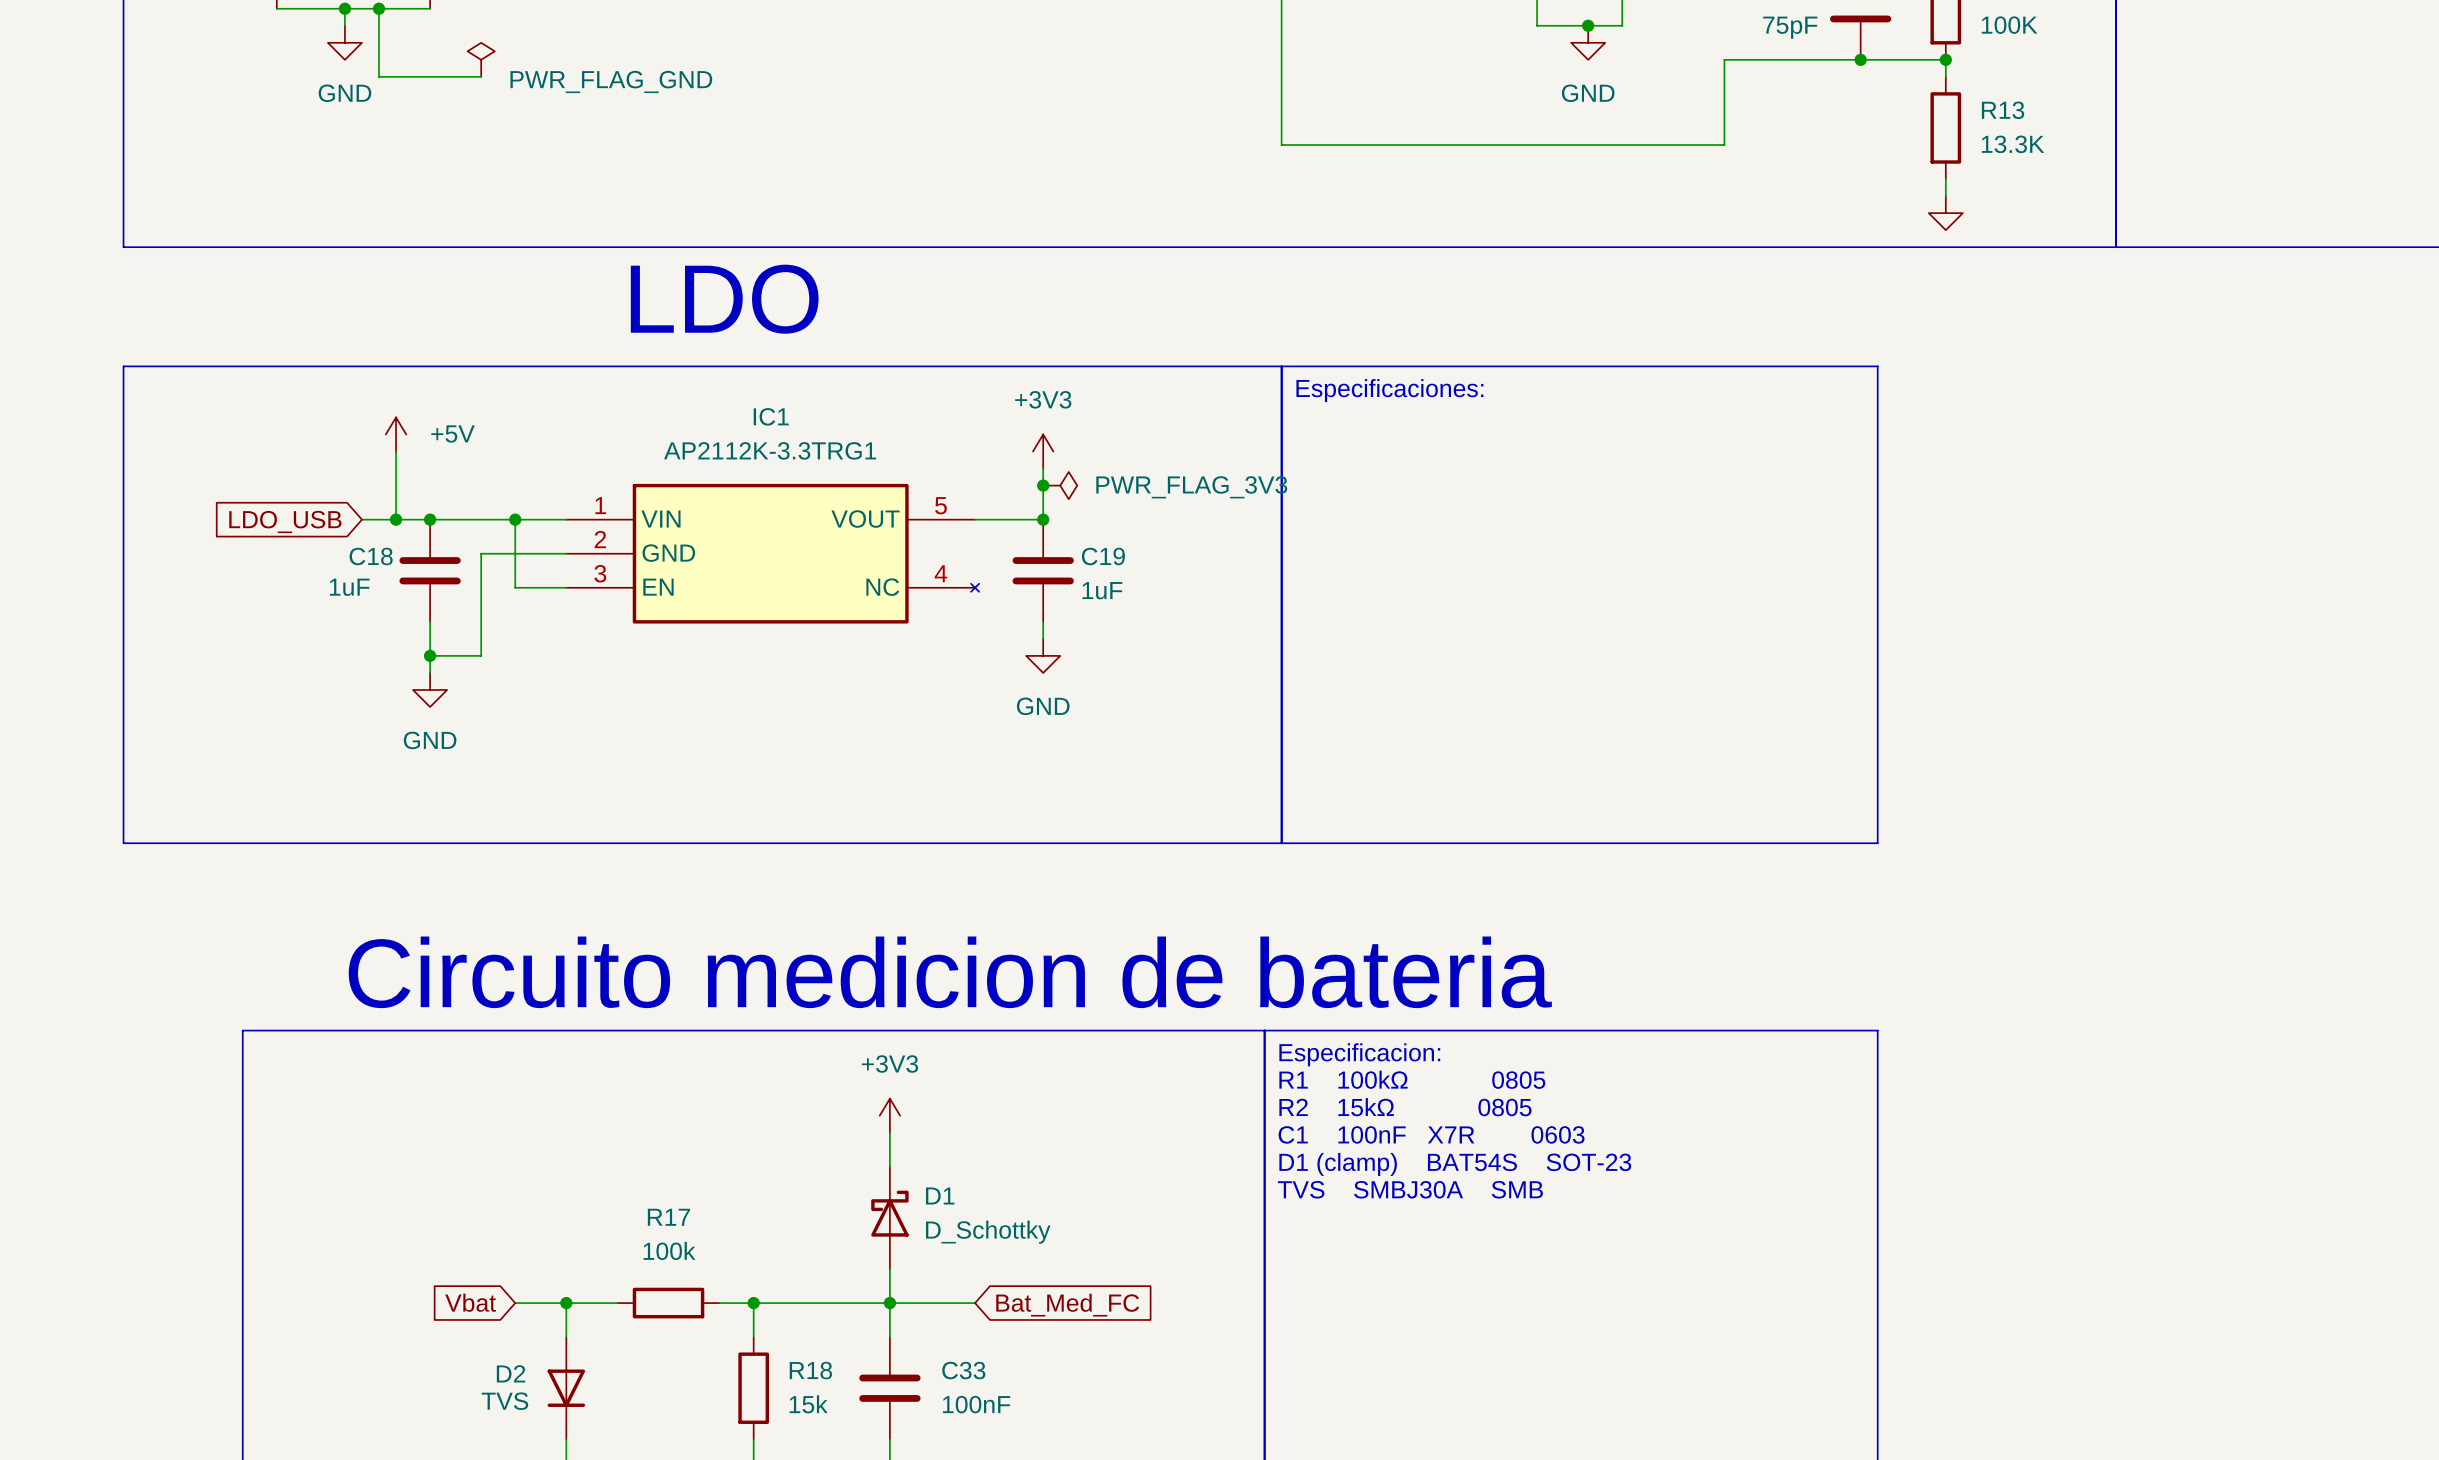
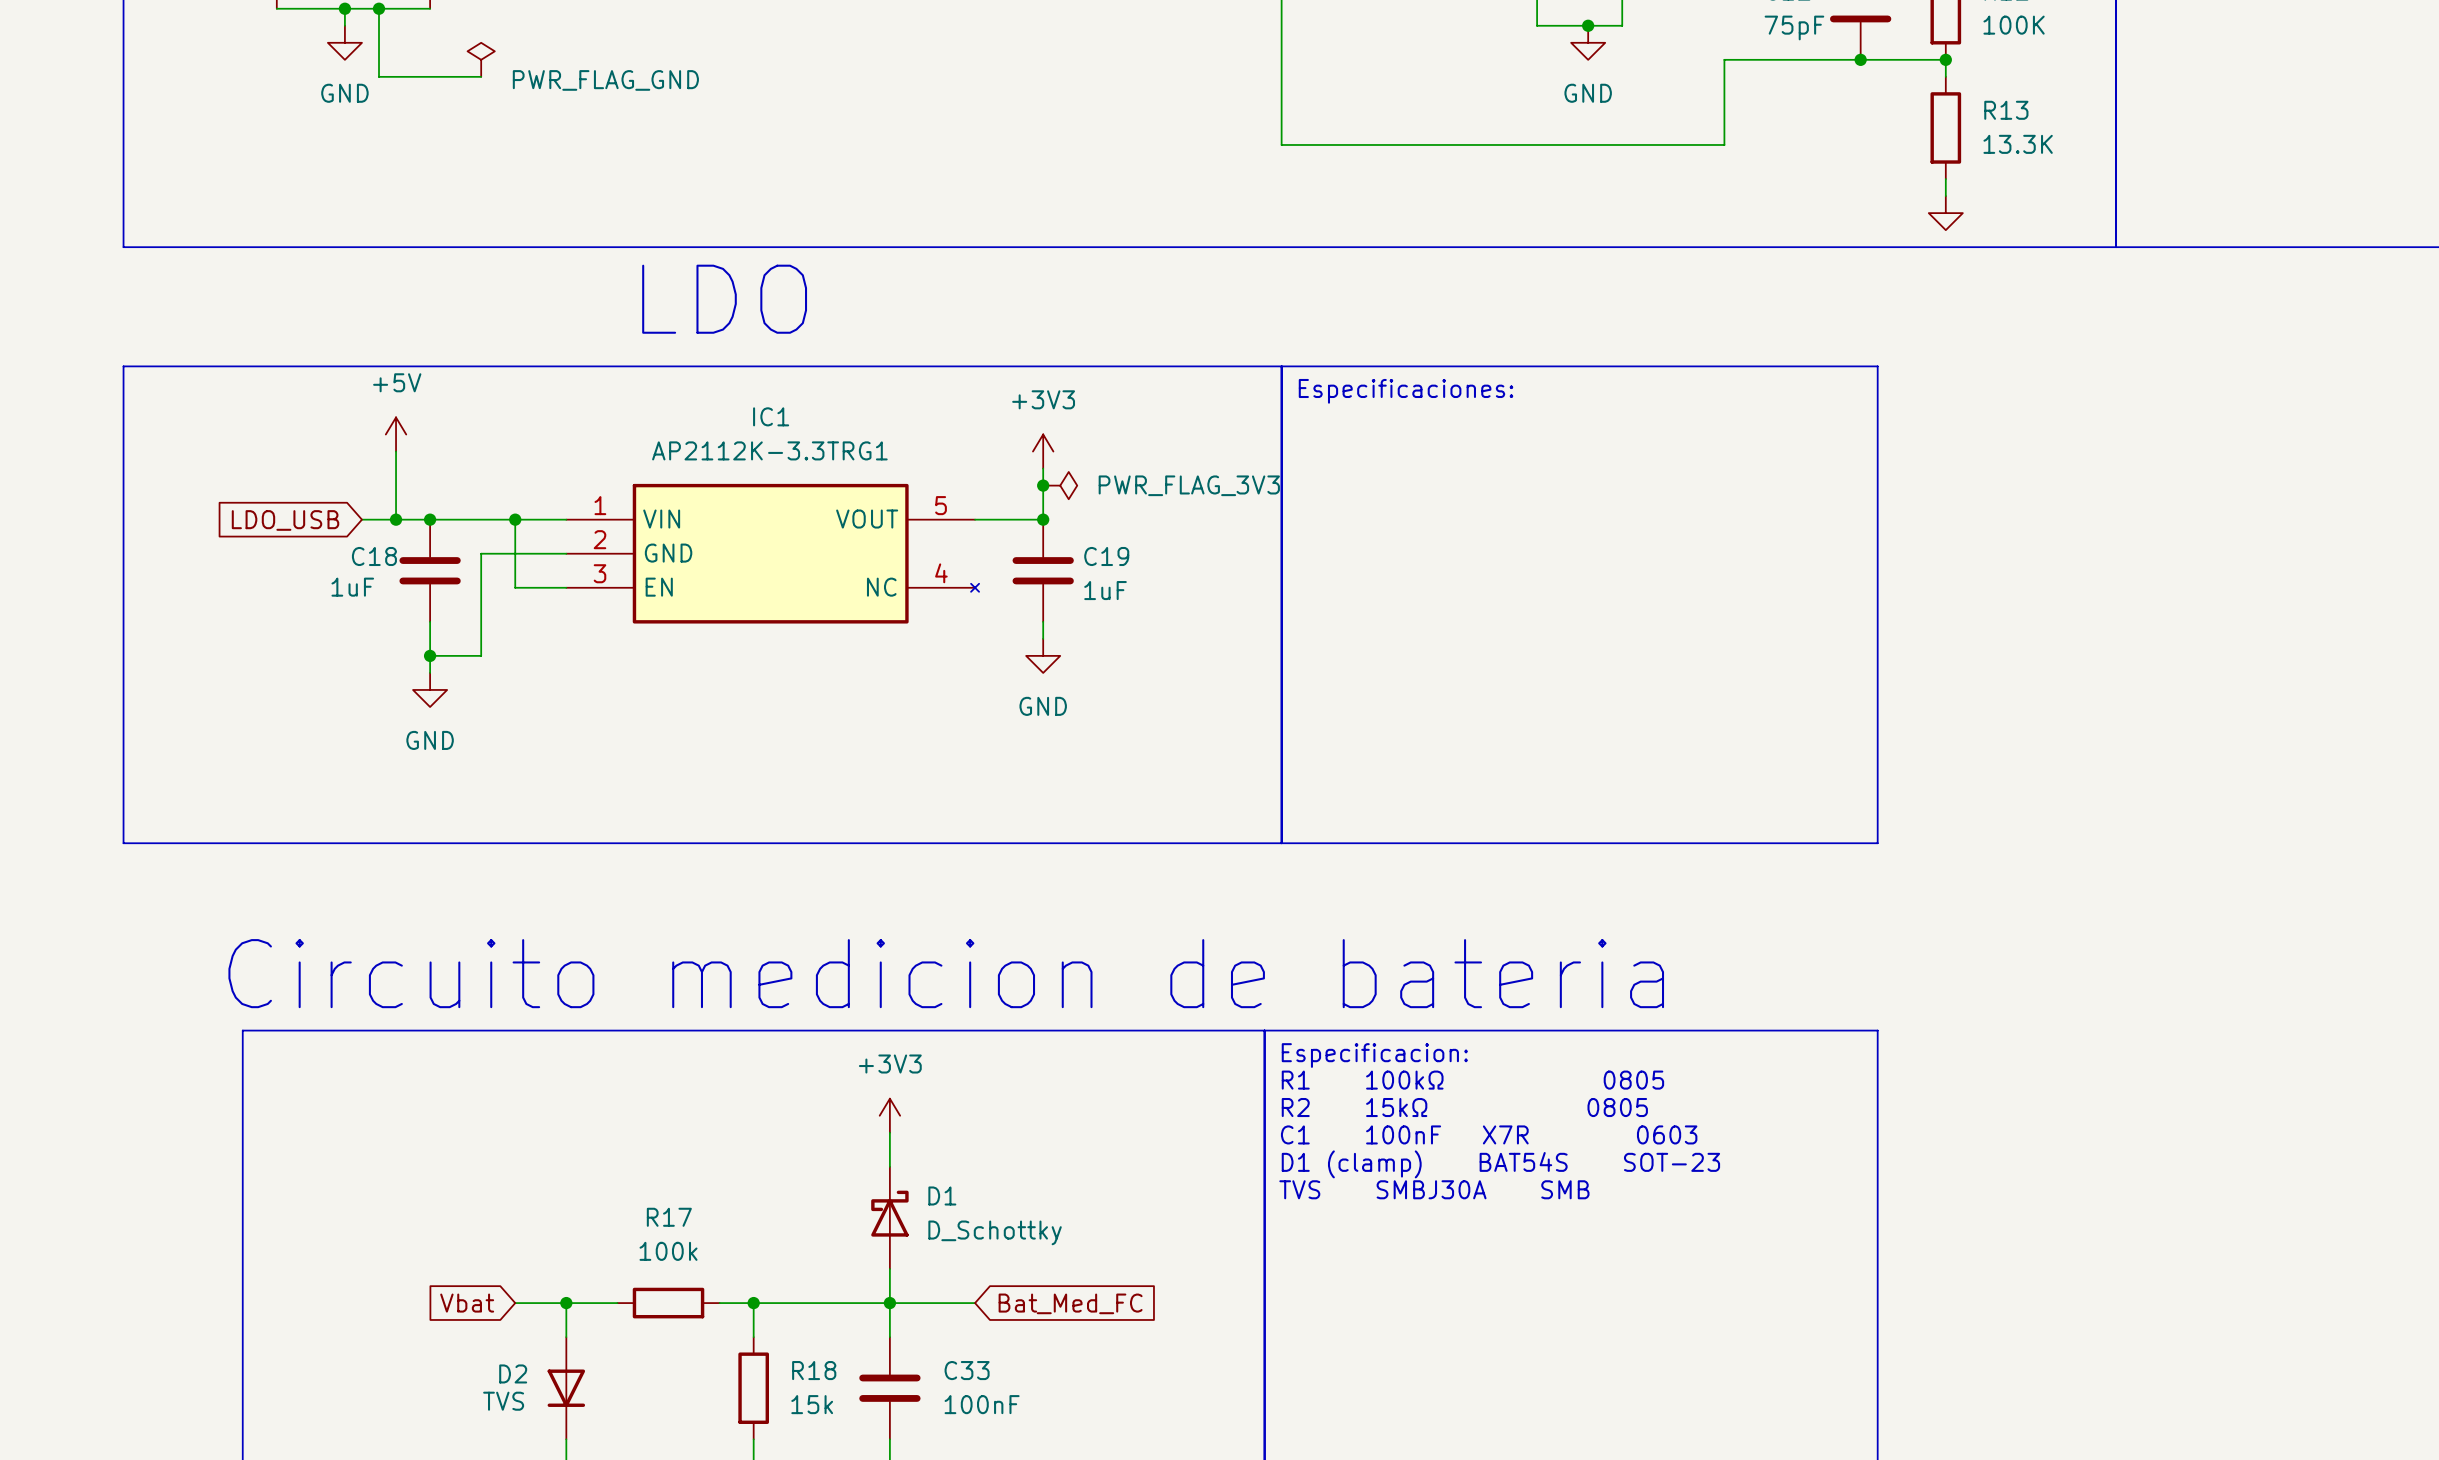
power symbol text position: +5V (453, 433) -> +5V (397, 382)

